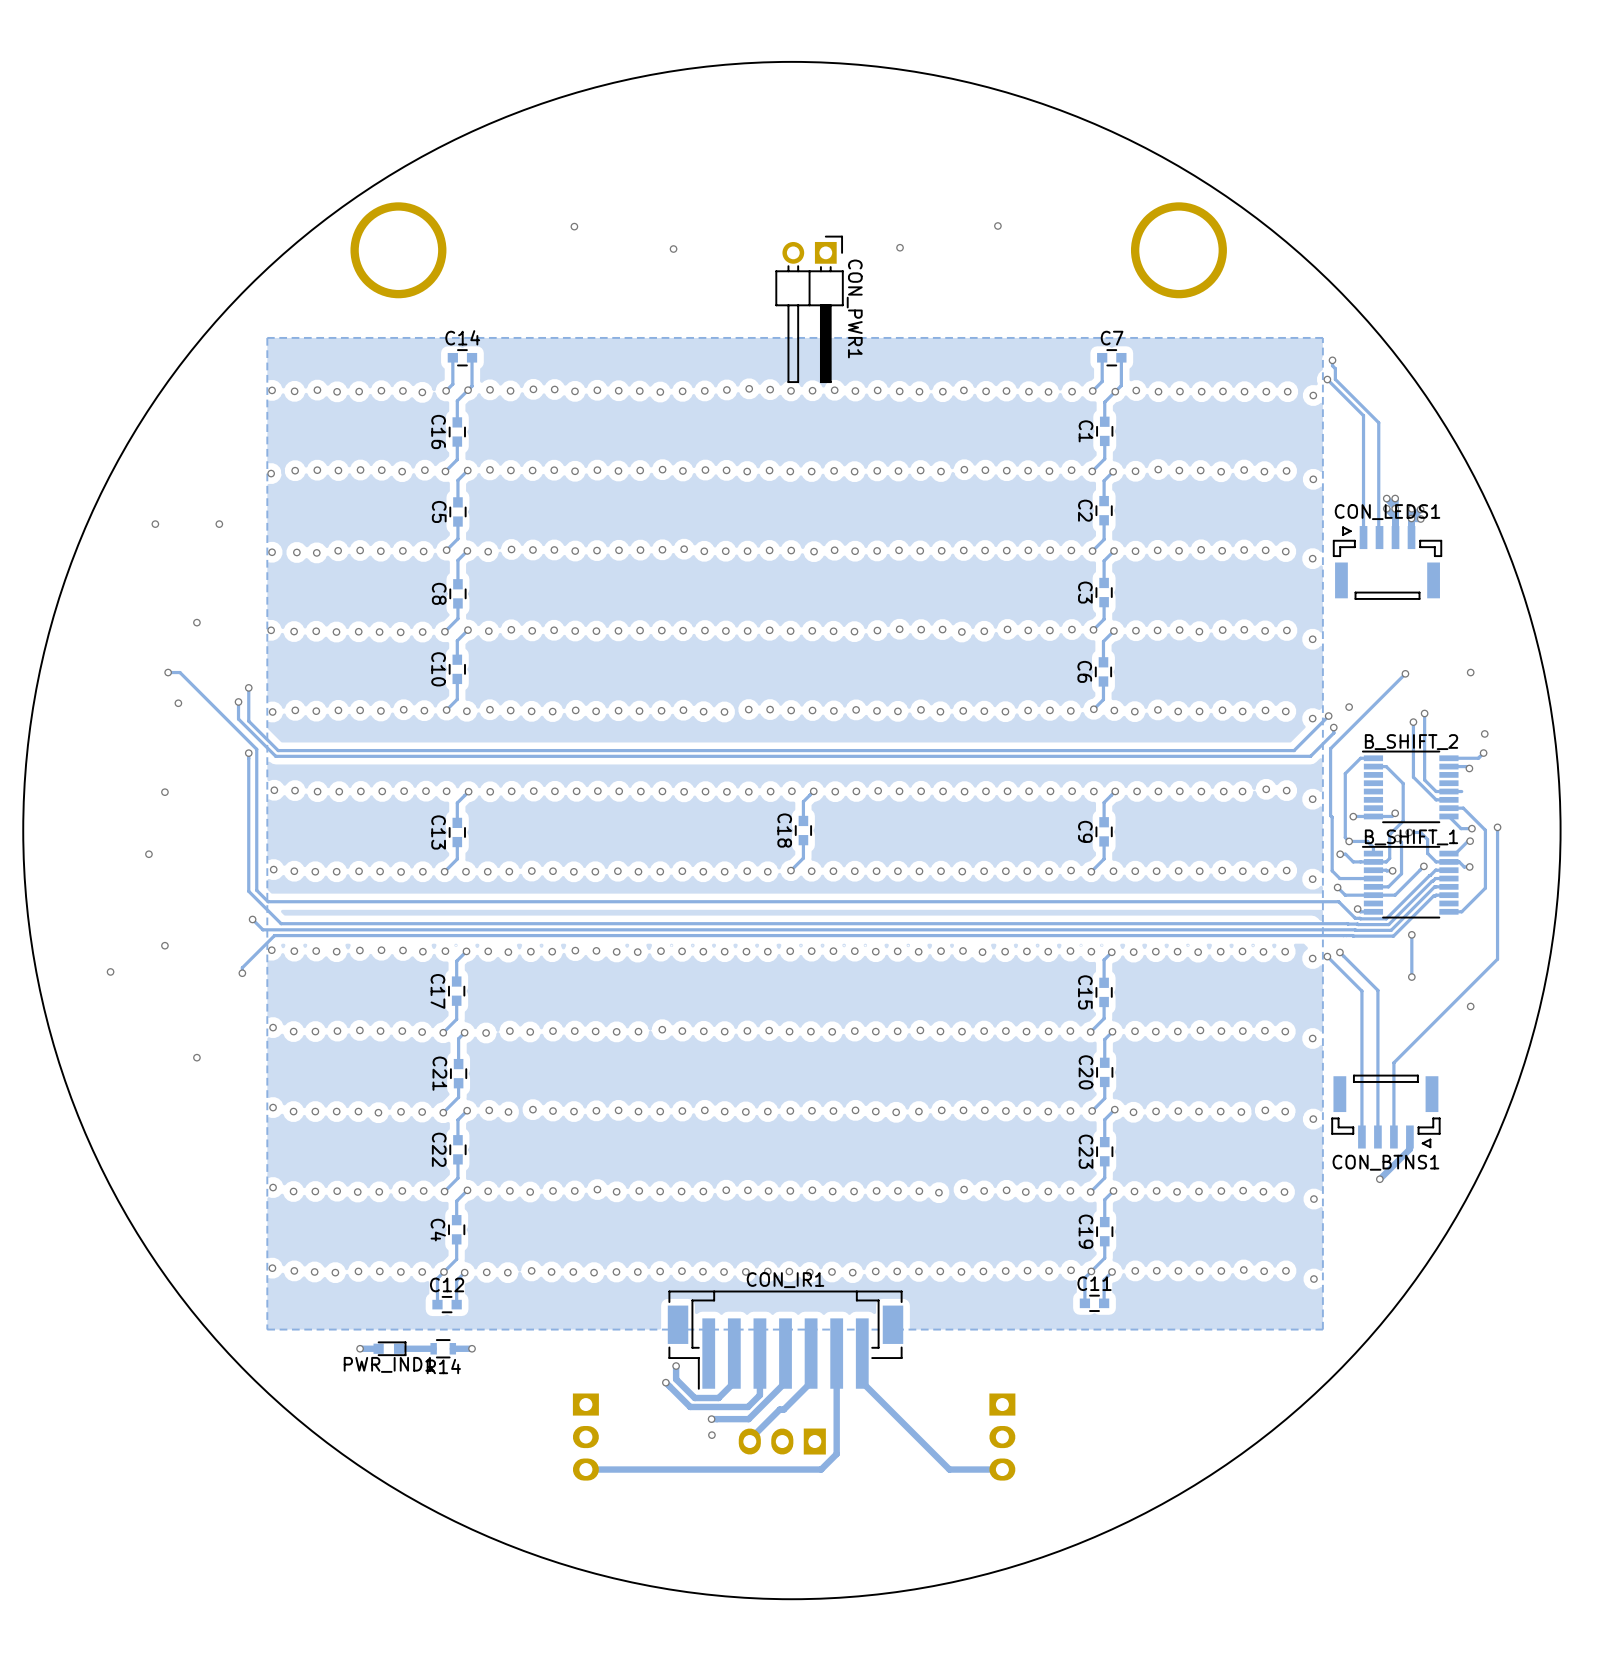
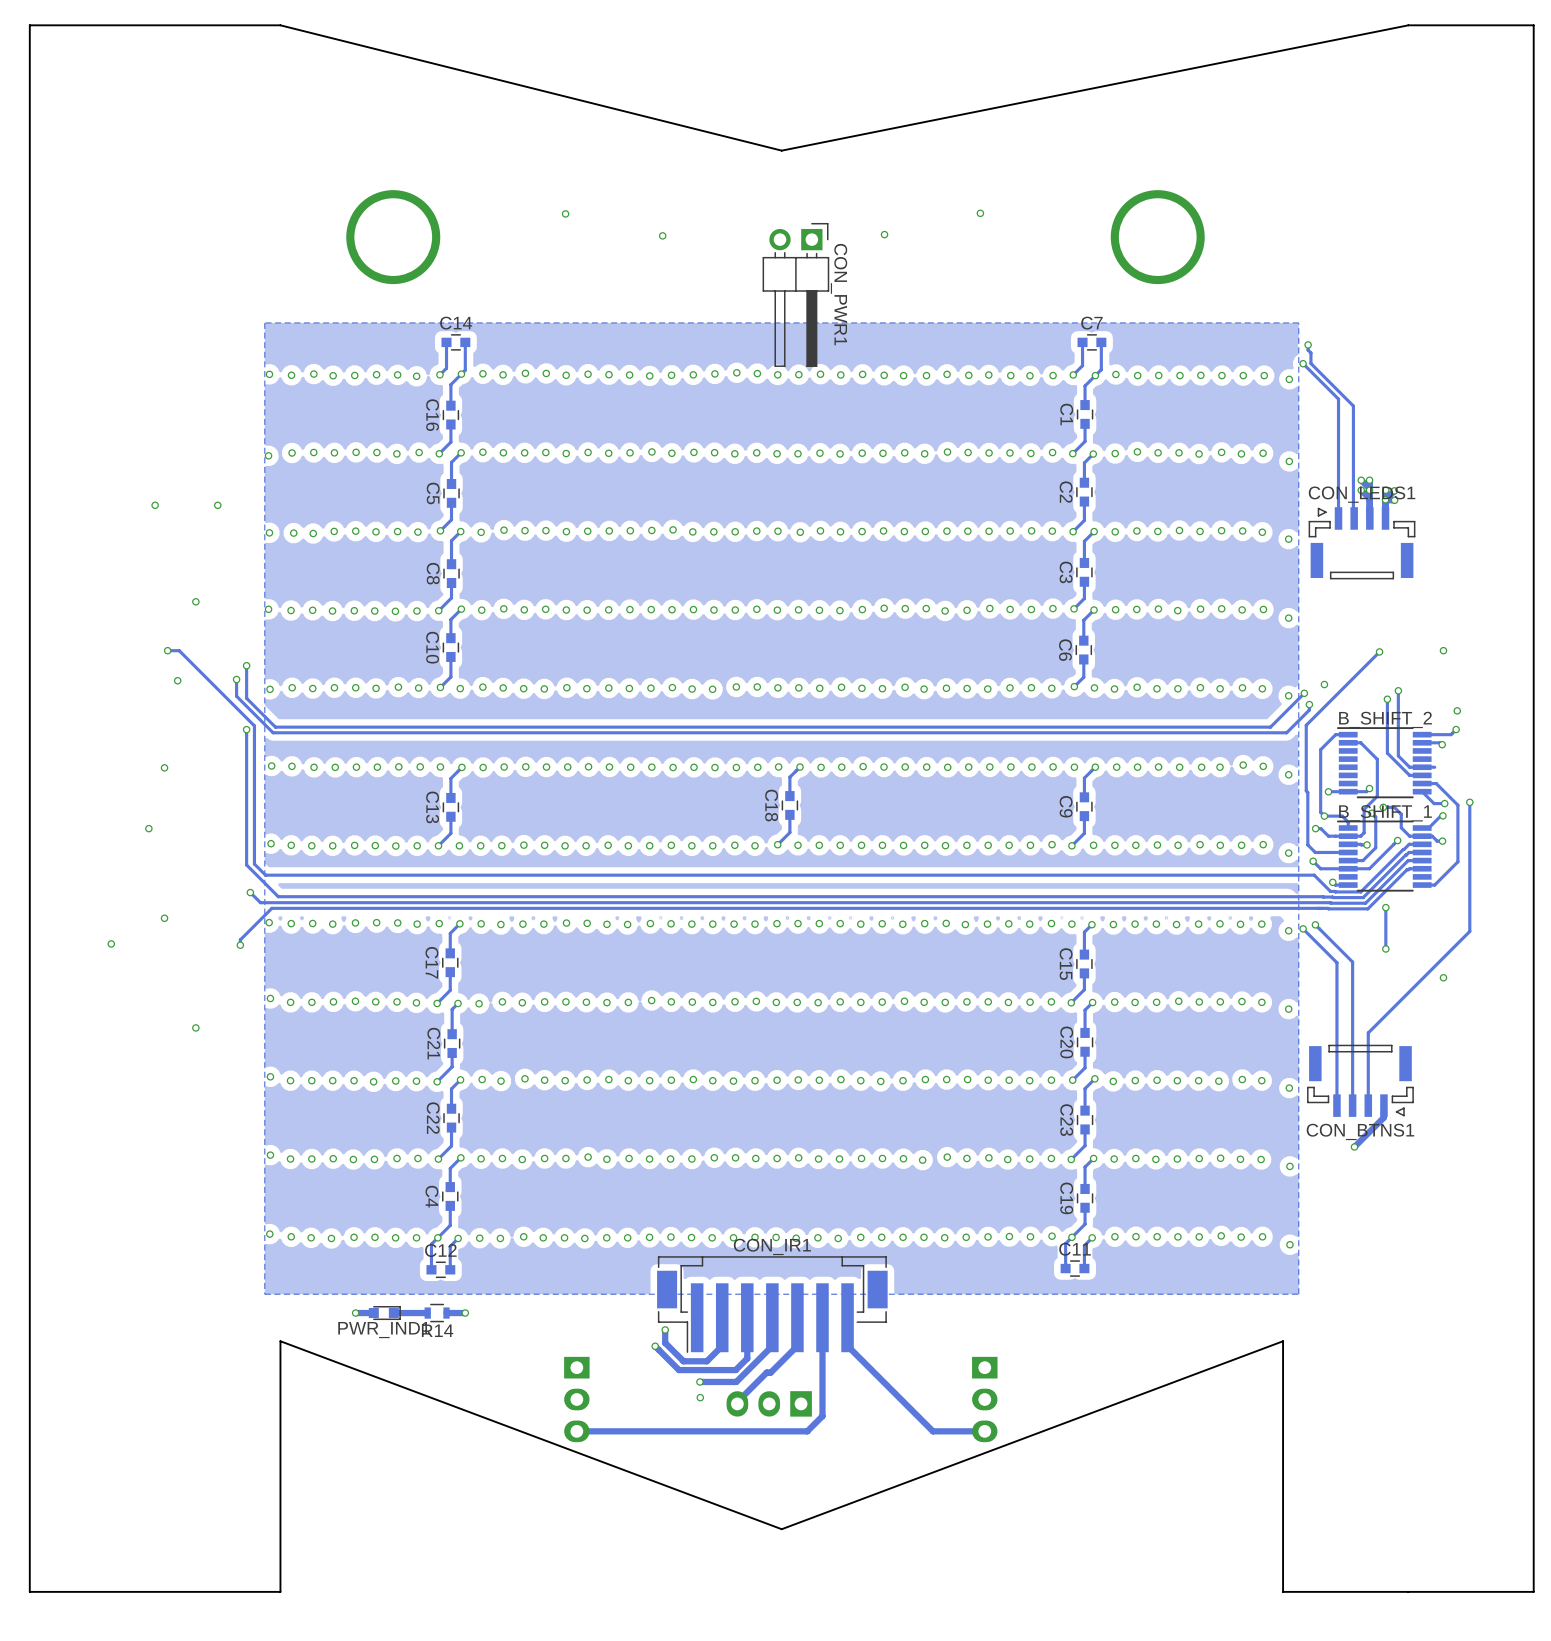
board edge: none -> (1533, 25) (1408, 25) (781, 150) (280, 25) (29, 25) (29, 1591) (280, 1591) (280, 1341) (781, 1529) (1283, 1341) (1283, 1591) (1533, 1591) (1533, 25)
round board edge: [22, 60, 1562, 1601] -> none

